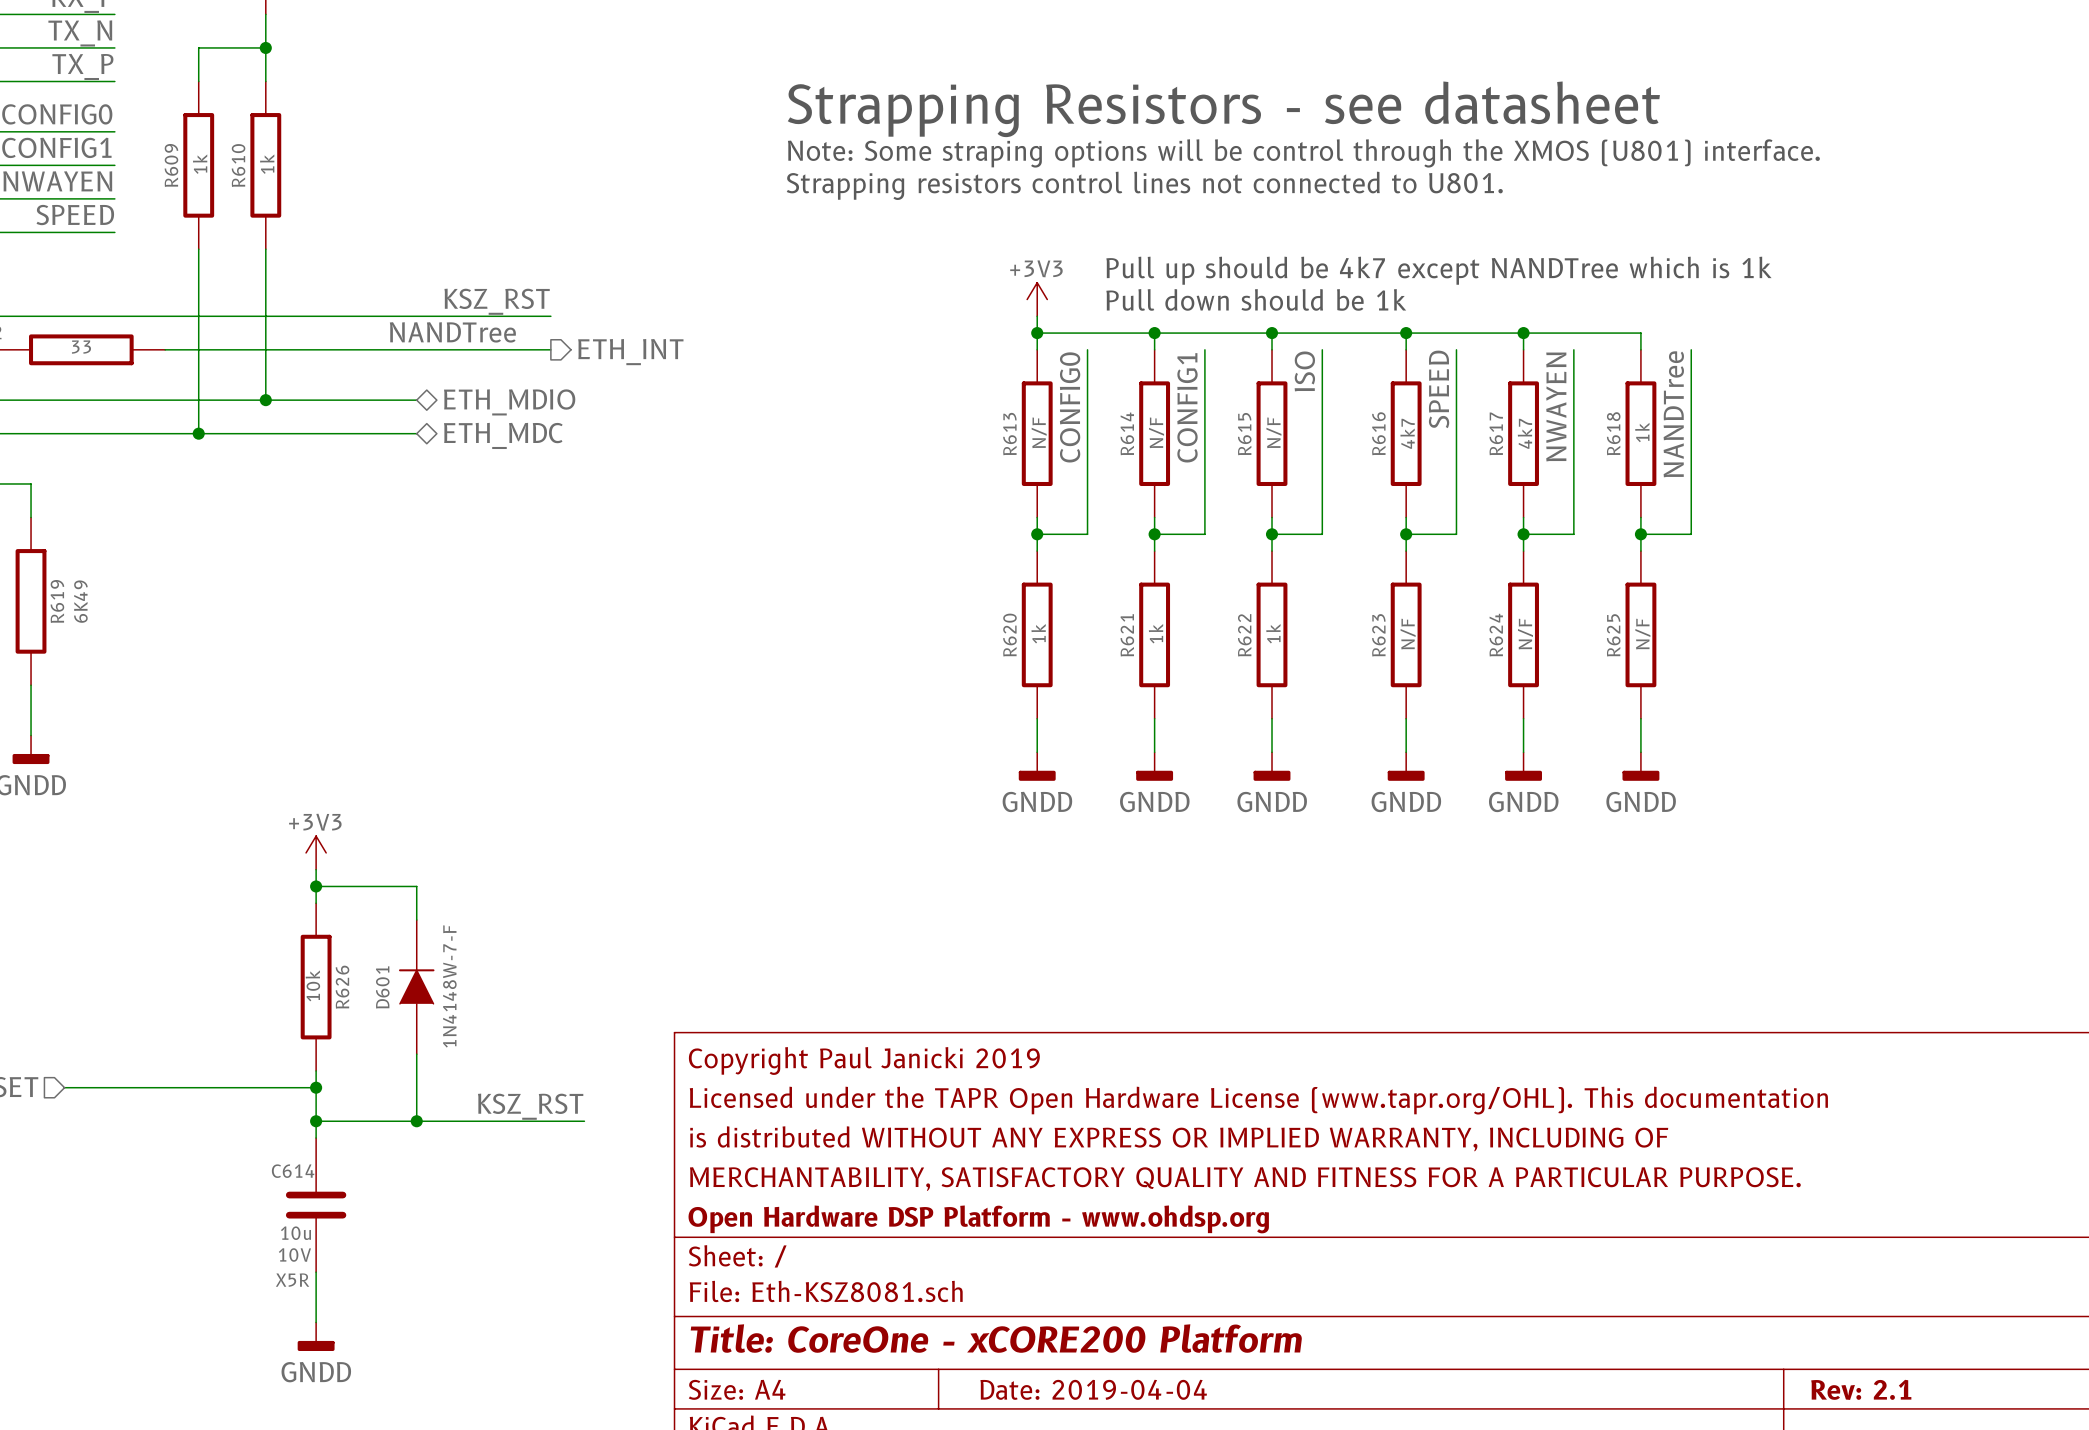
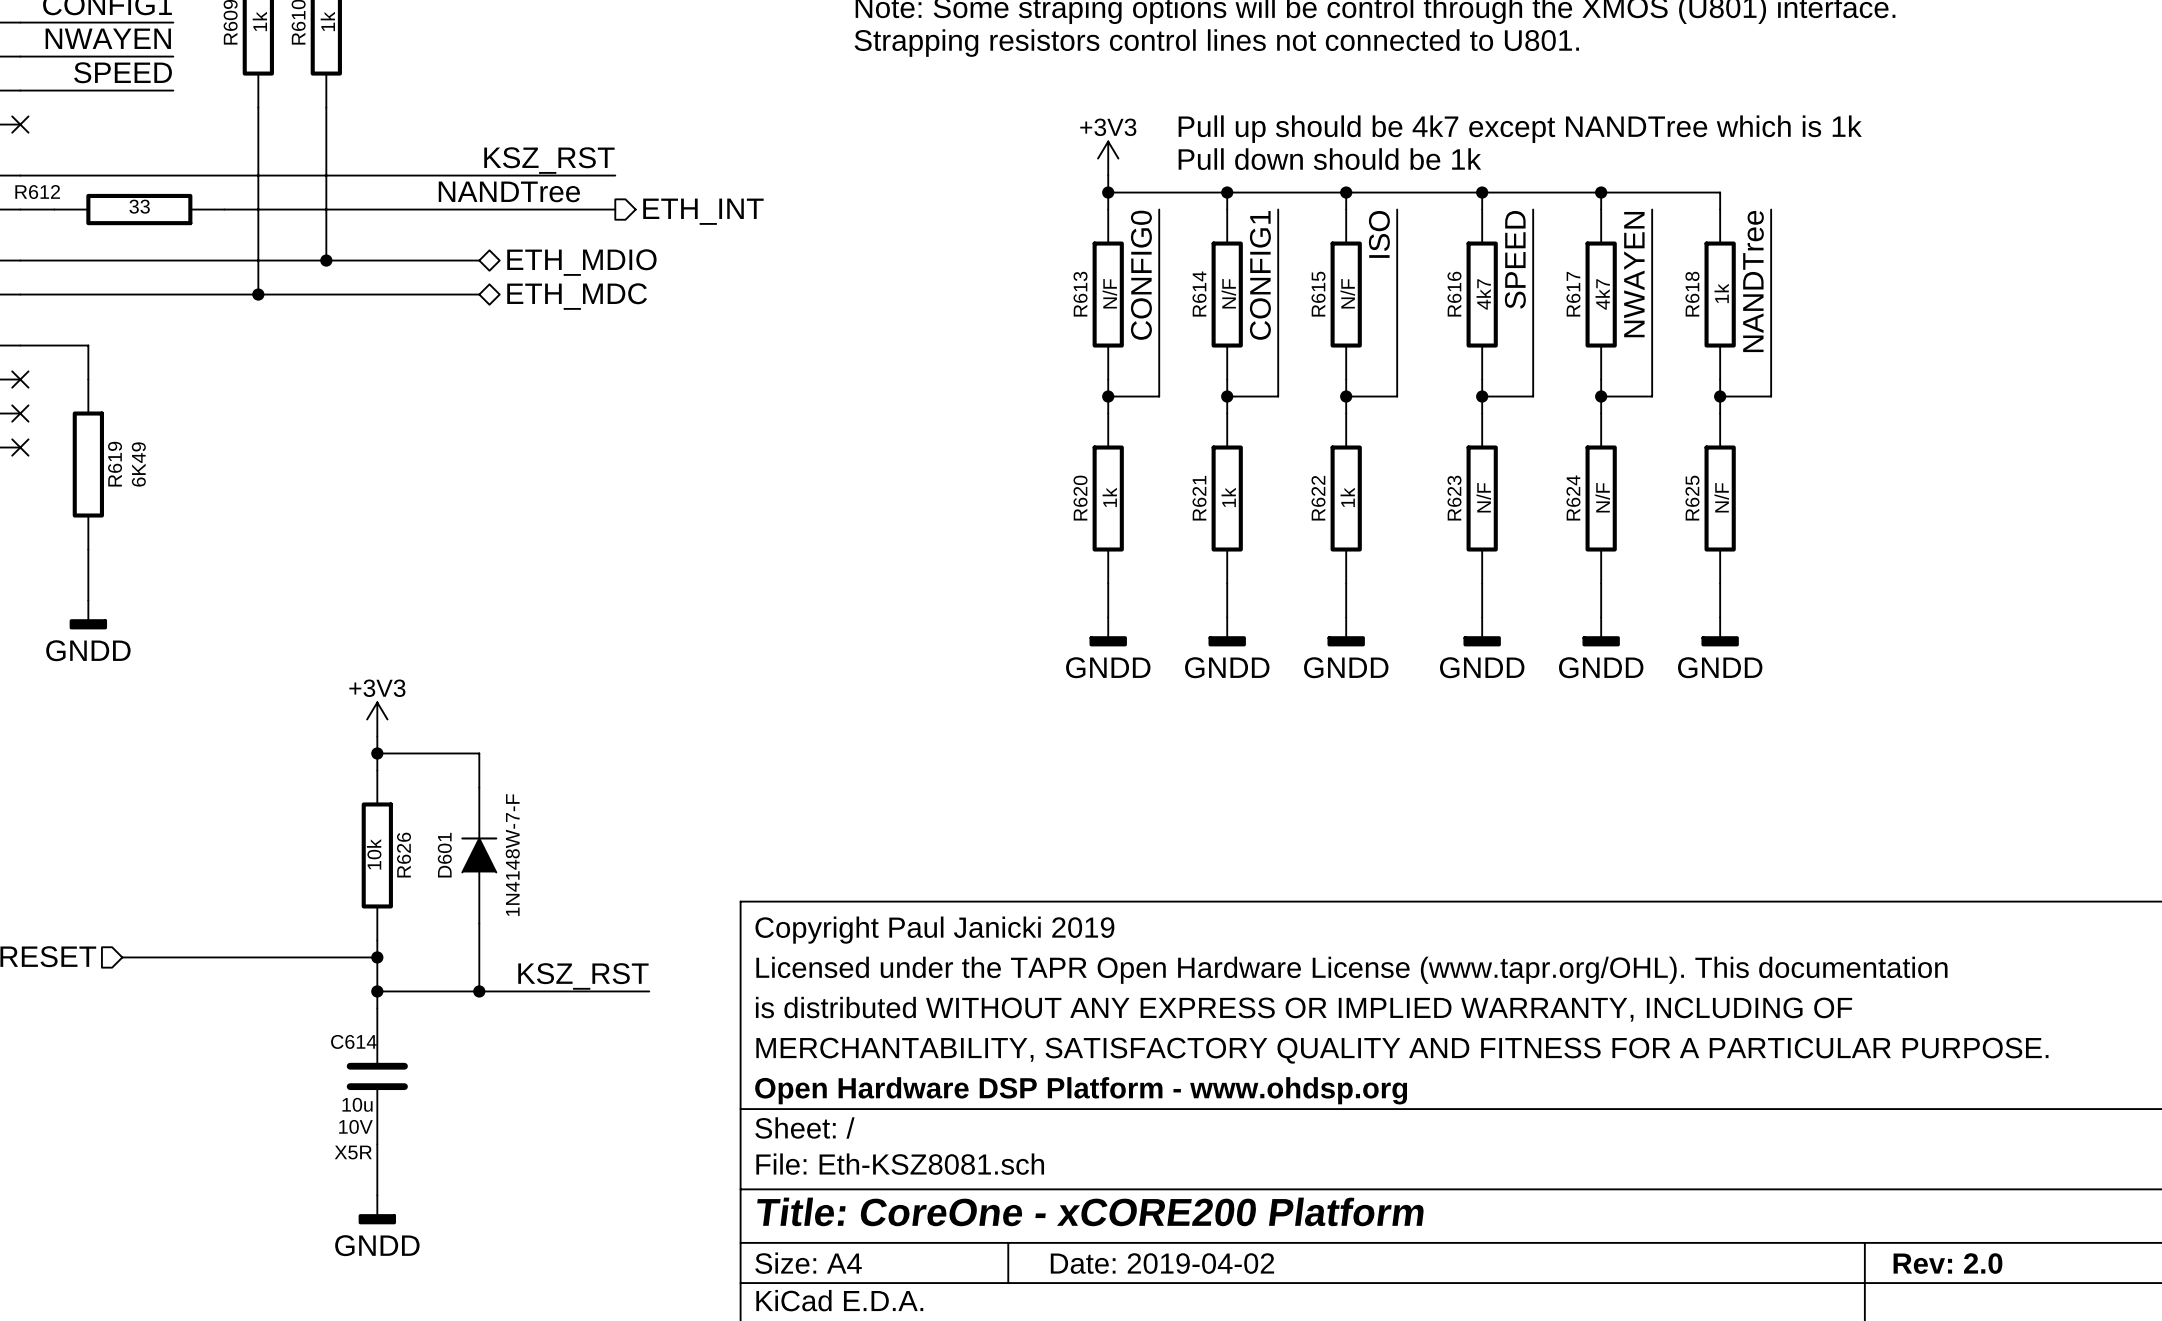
title block: Date: 2019-04-04 (1093, 1389) -> Date: 2019-04-02 (1162, 1263)
title block: Rev: 2.1 (1861, 1389) -> Rev: 2.0 (1947, 1263)

